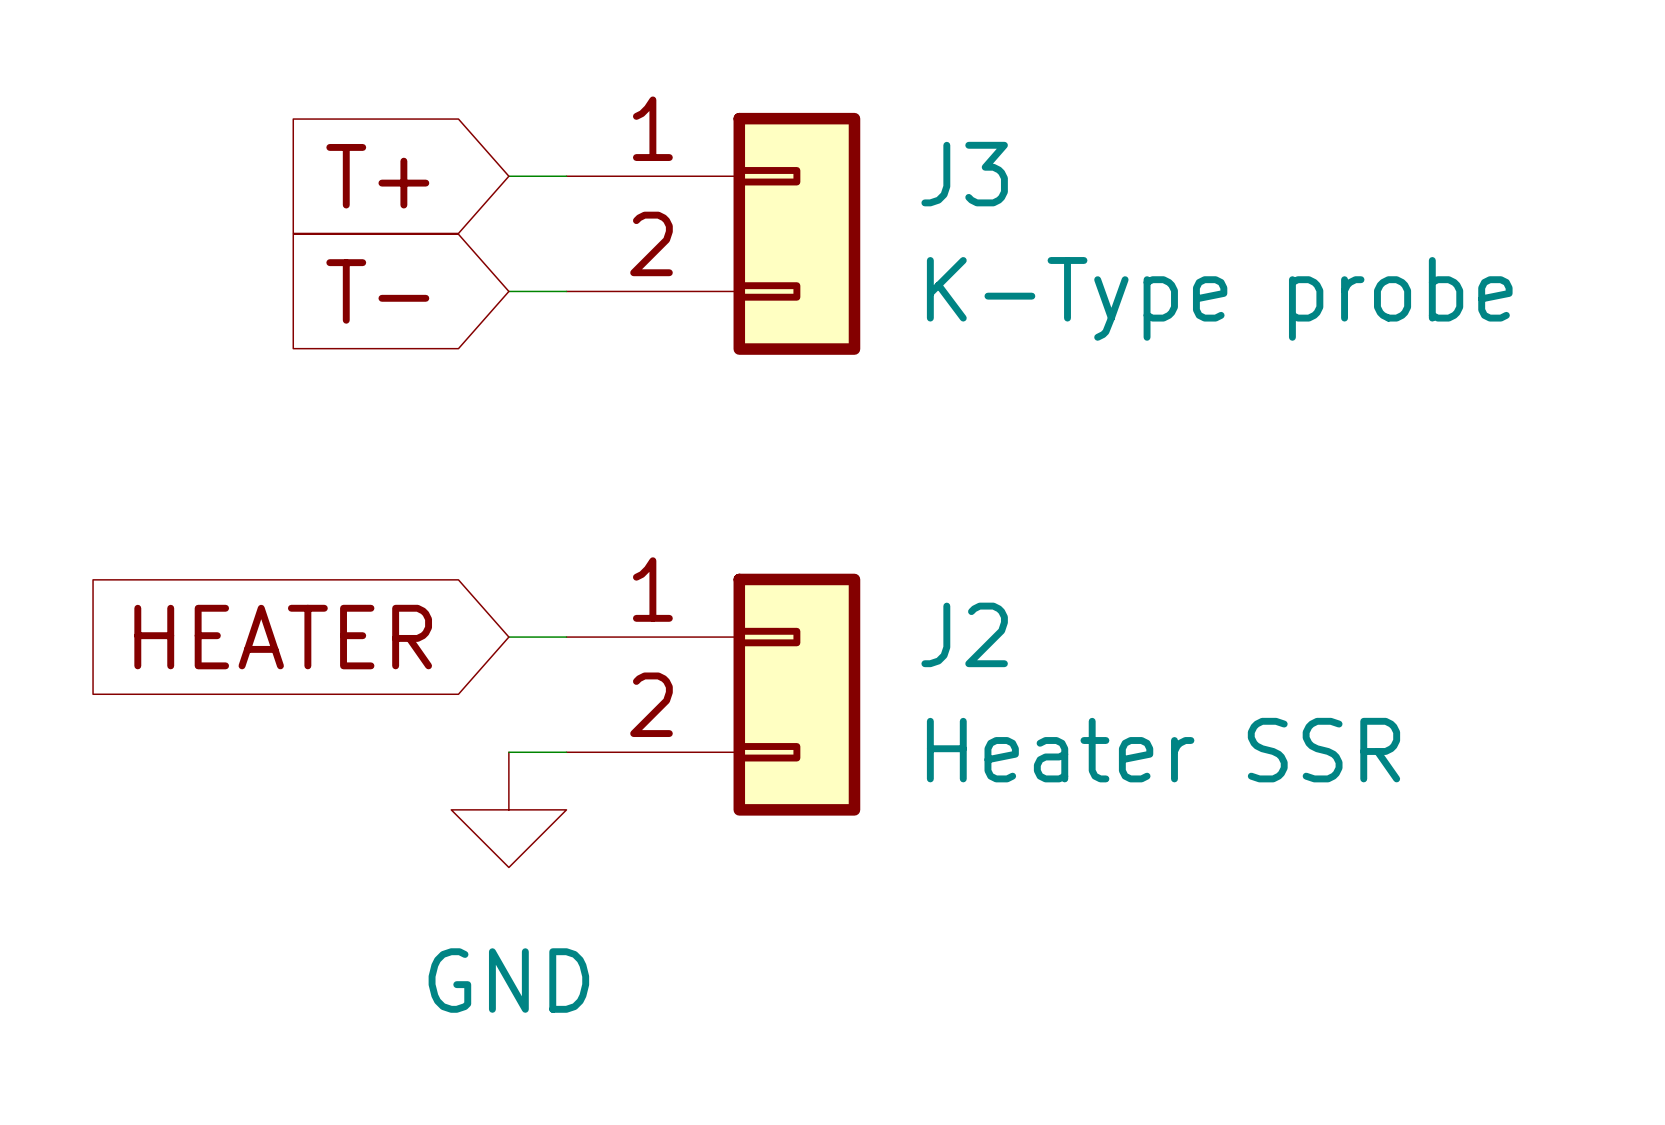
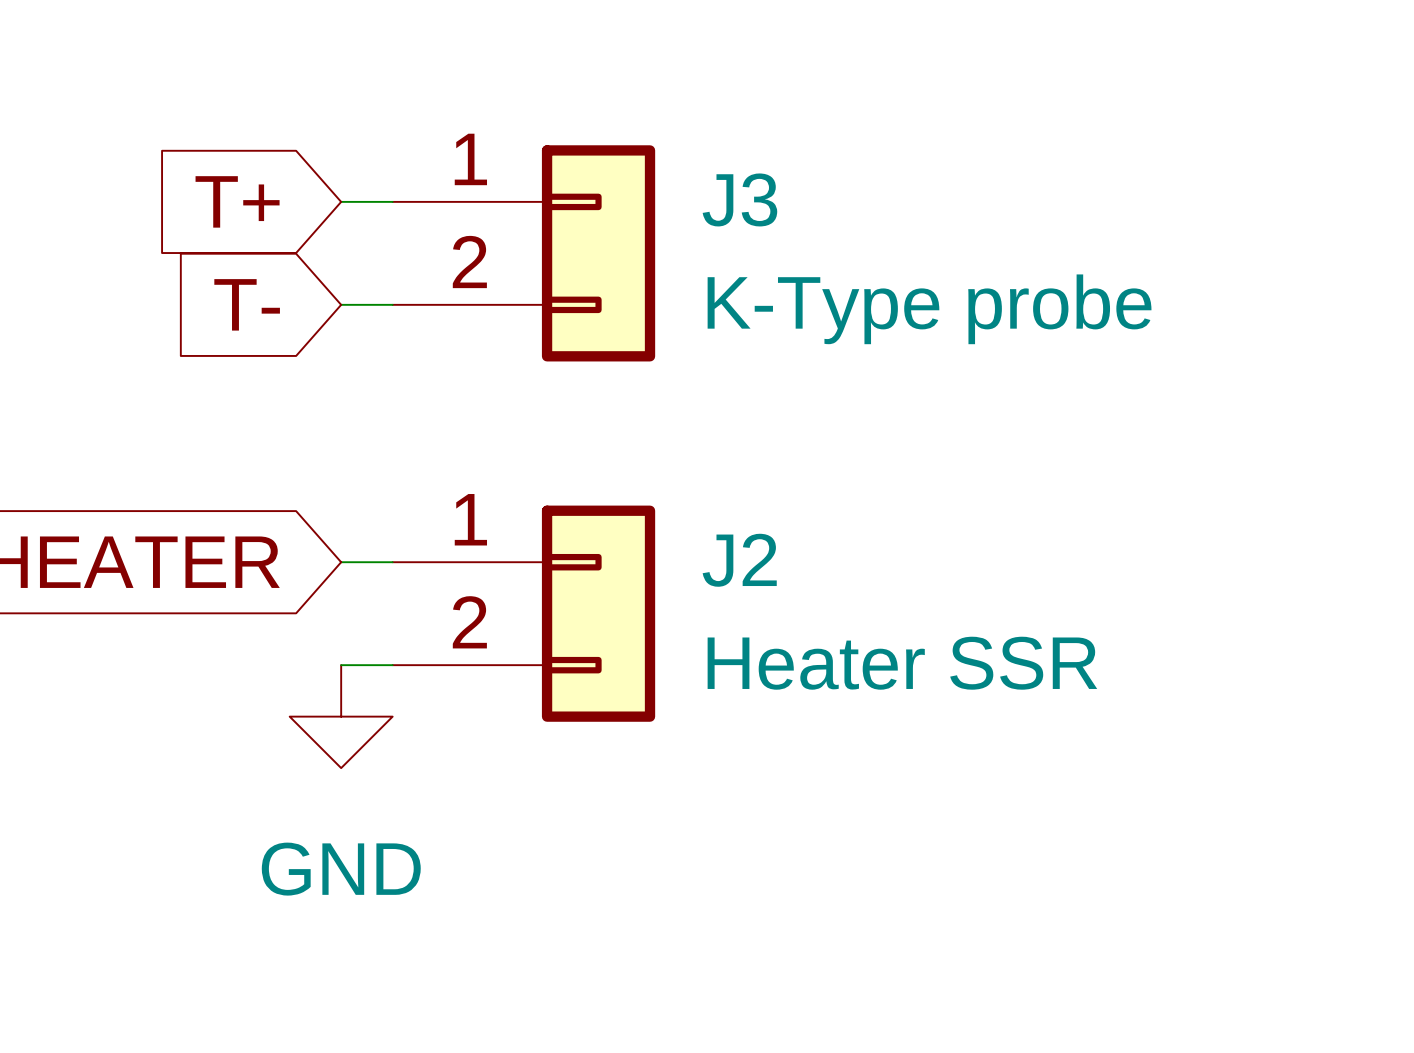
global label position: T+ (377, 176) -> T+ (237, 201)
wire: (508, 176) (566, 176) -> (341, 201) (392, 201)
J3 position: (713, 233) -> (523, 253)
global label position: T- (377, 291) -> T- (247, 304)
wire: (508, 291) (566, 291) -> (341, 304) (392, 304)

